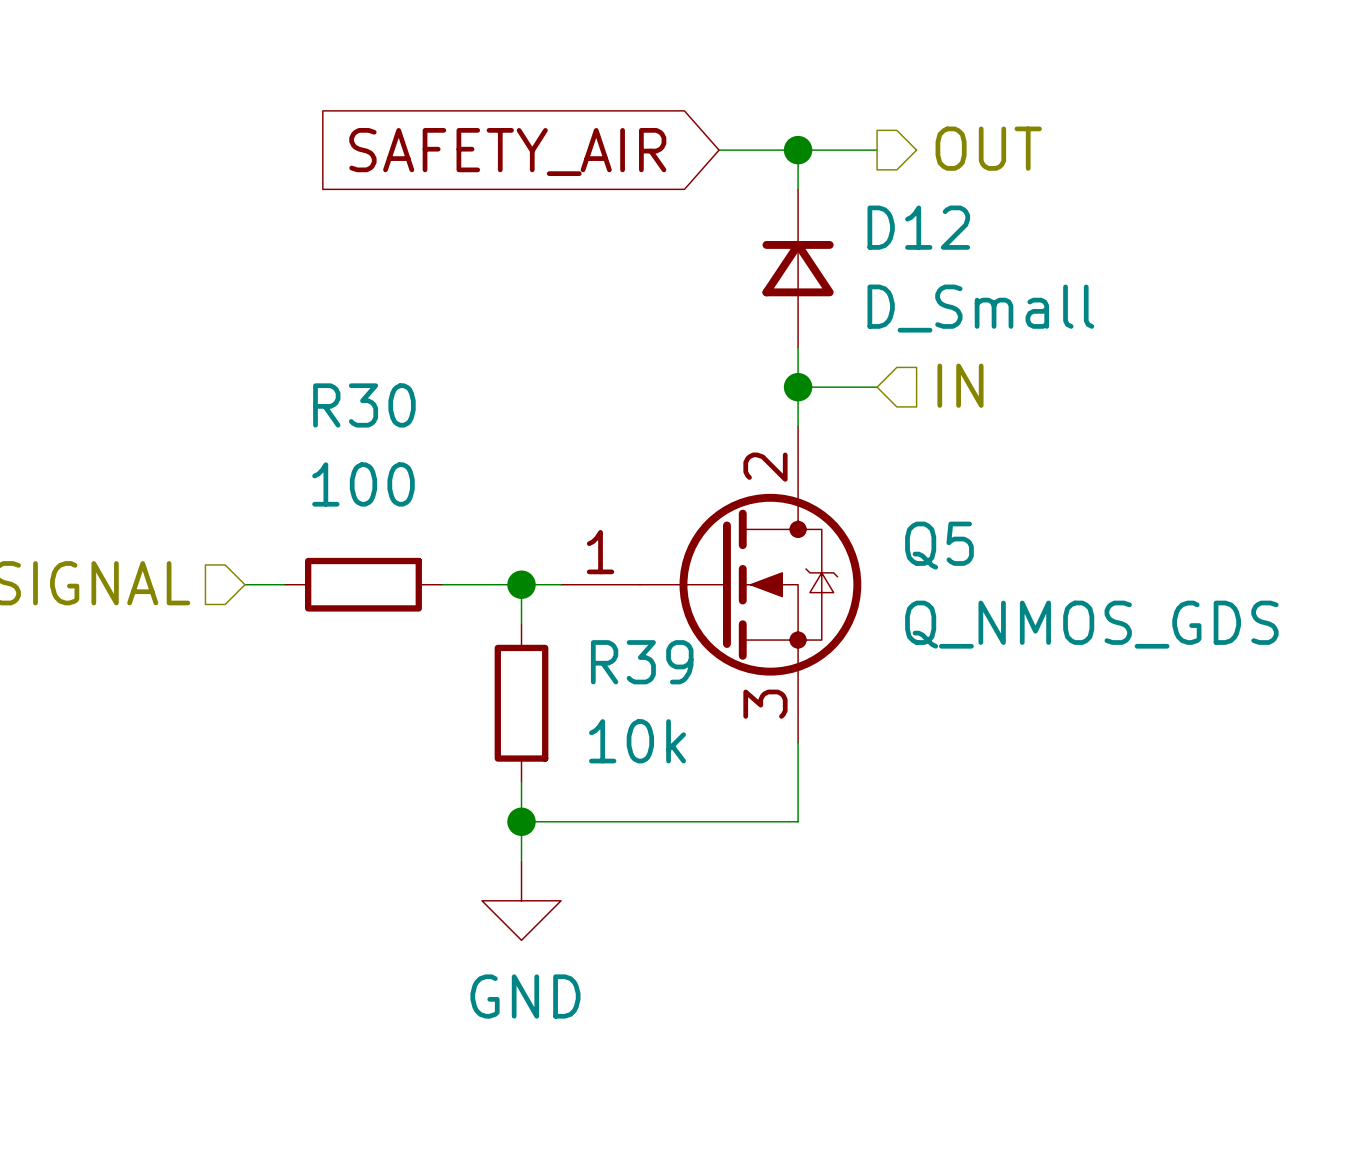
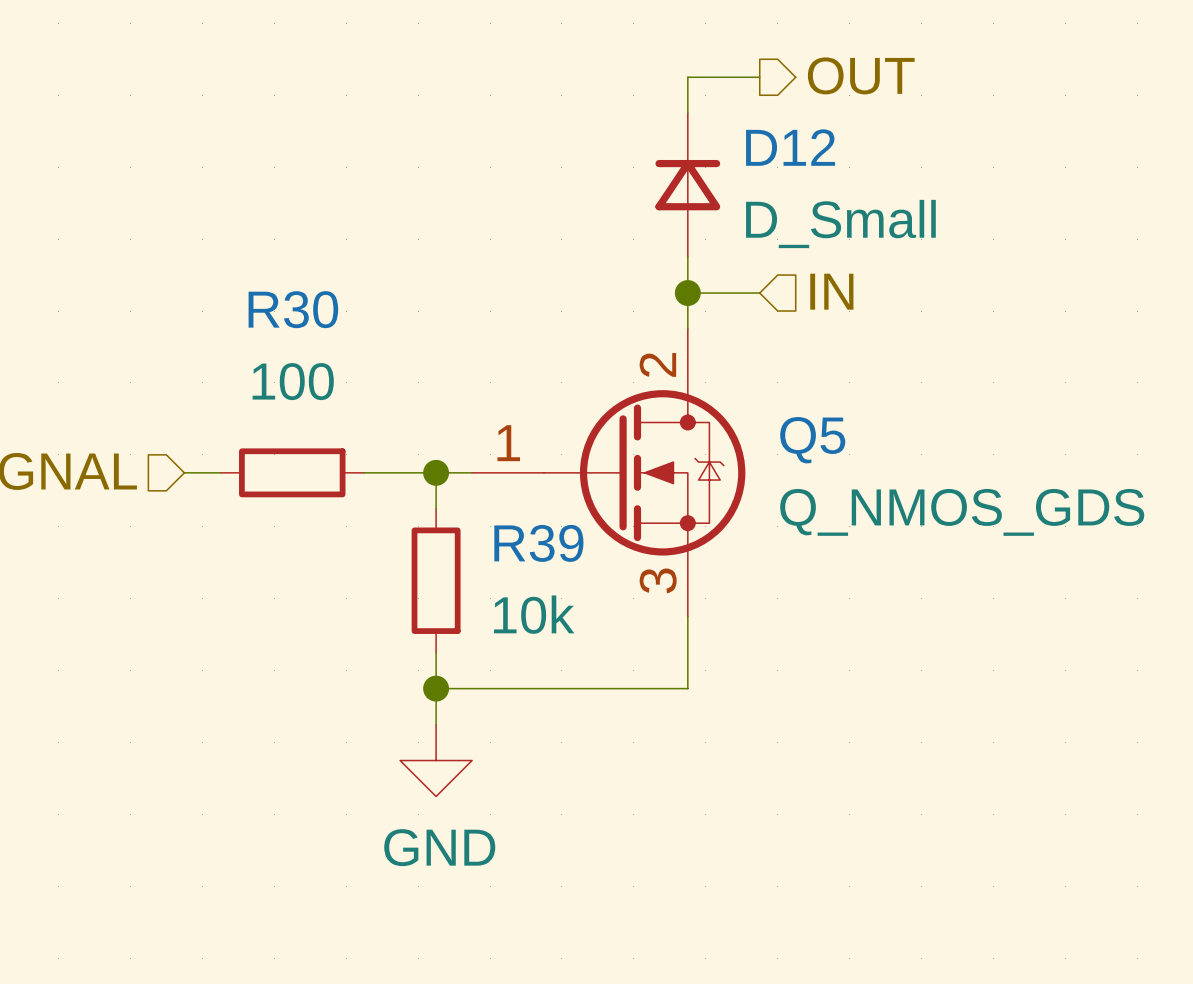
wire: (719, 150) (798, 150) -> none
junction: (798, 150) -> none
global label: SAFETY_AIR (507, 152) -> none

